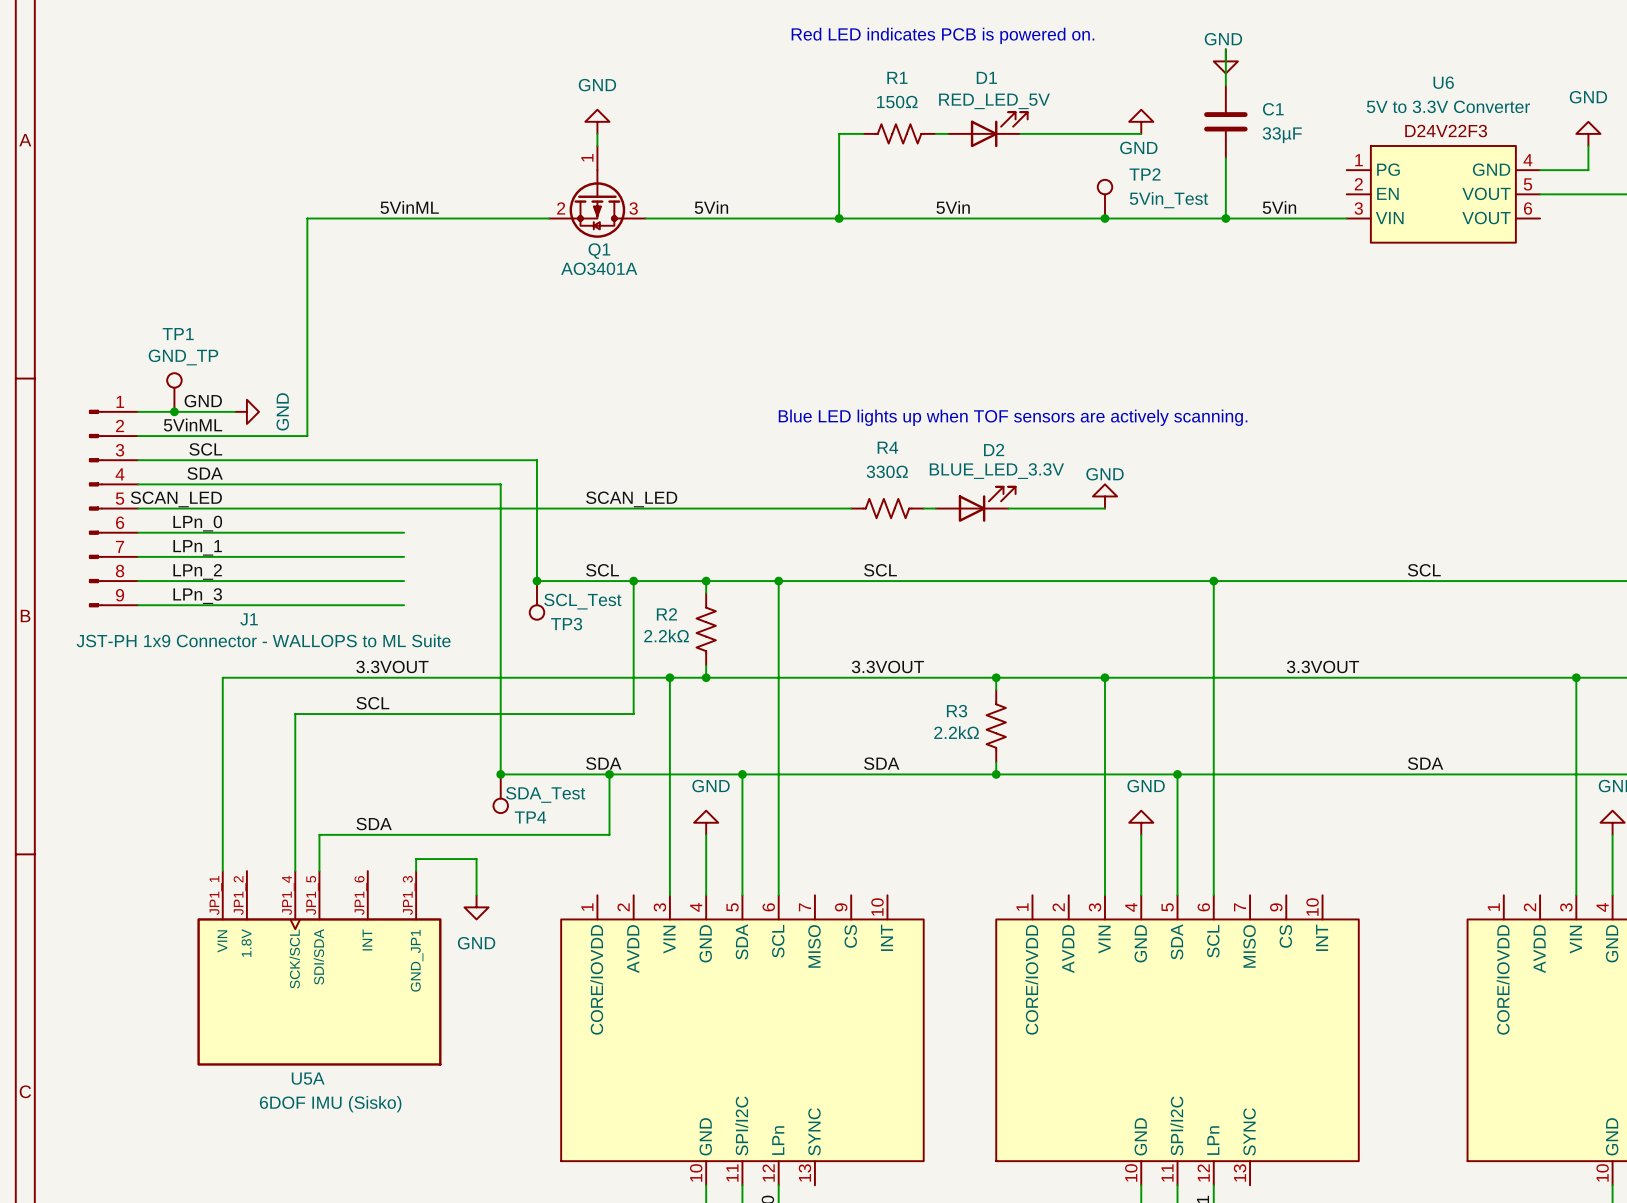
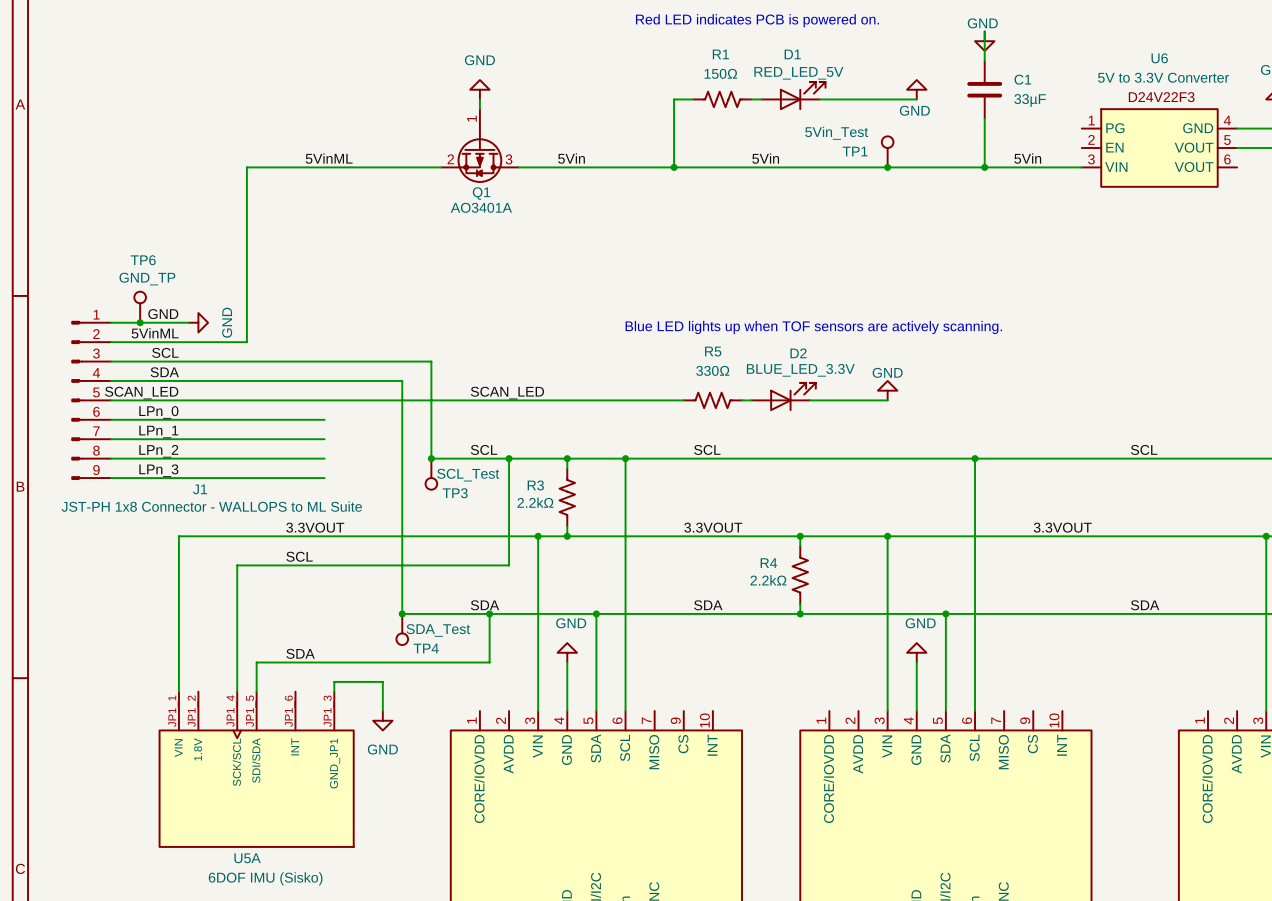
TP2 name: TP2 (1145, 174) -> TP1 (855, 151)
TP2 value position: 5Vin_Test (1169, 200) -> 5Vin_Test (836, 133)
TP1 name: TP1 (178, 334) -> TP6 (143, 260)
R4 name: R4 (887, 447) -> R5 (713, 351)
R2 name: R2 (666, 614) -> R3 (535, 485)
J1 value: JST-PH 1x9 Connector - WALLOPS to ML Suite (263, 640) -> JST-PH 1x8 Connector - WALLOPS to ML Suite (211, 506)
R3 name: R3 (957, 711) -> R4 (768, 563)

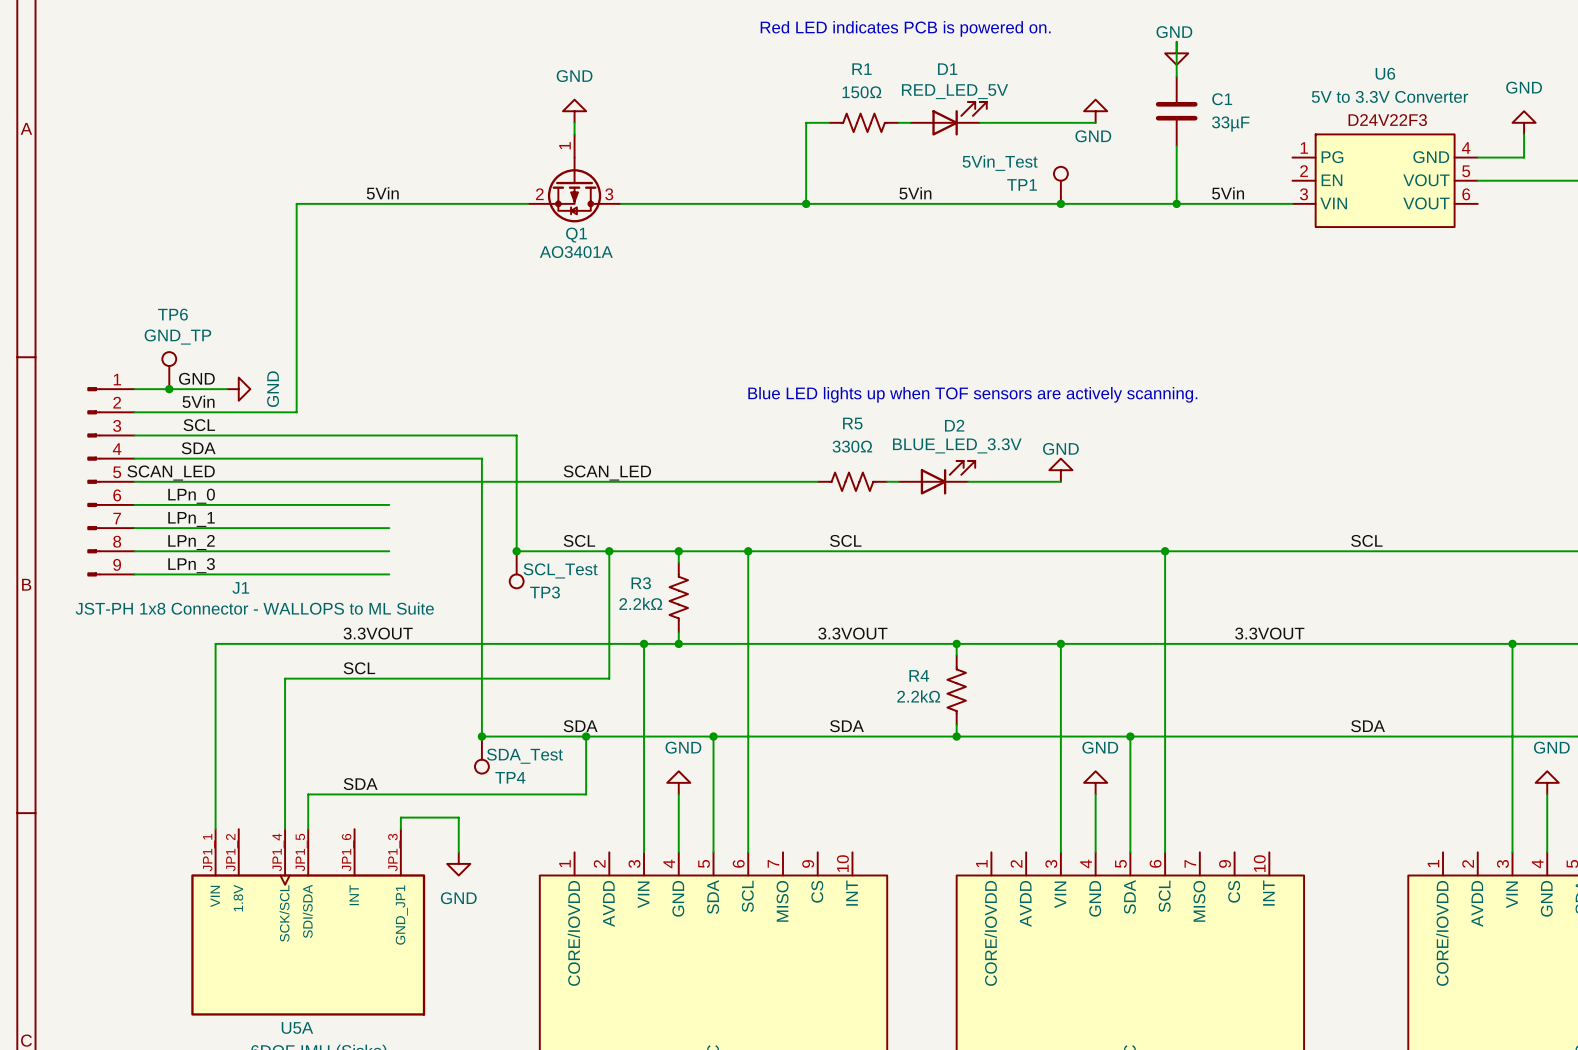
label: 5VinML (329, 158) -> 5Vin (382, 193)
label: 5Vin (571, 158) -> none
label: 5VinML (155, 333) -> 5Vin (198, 401)

